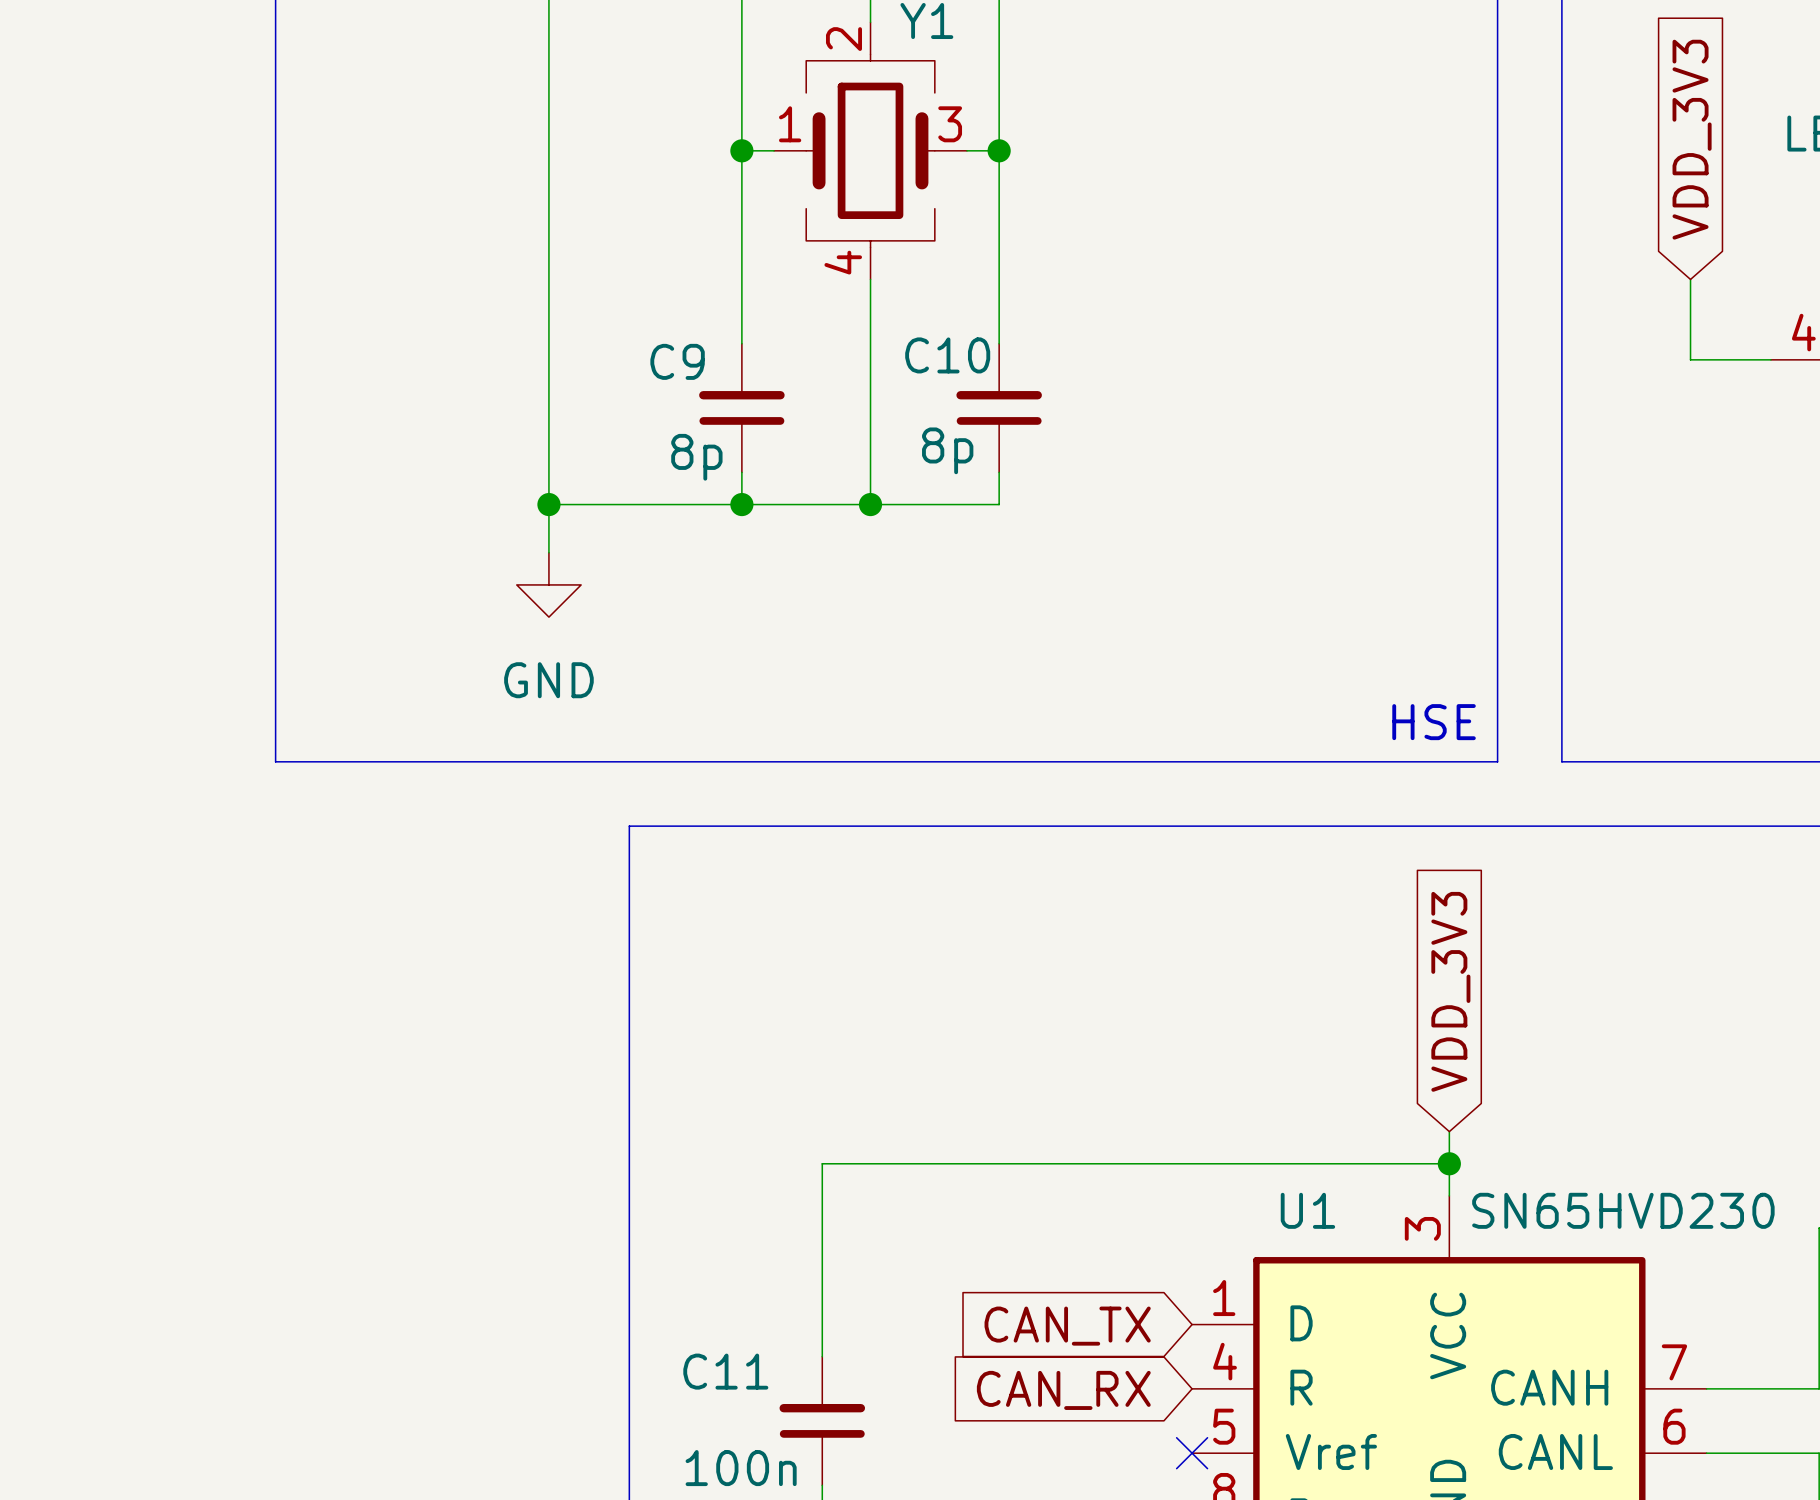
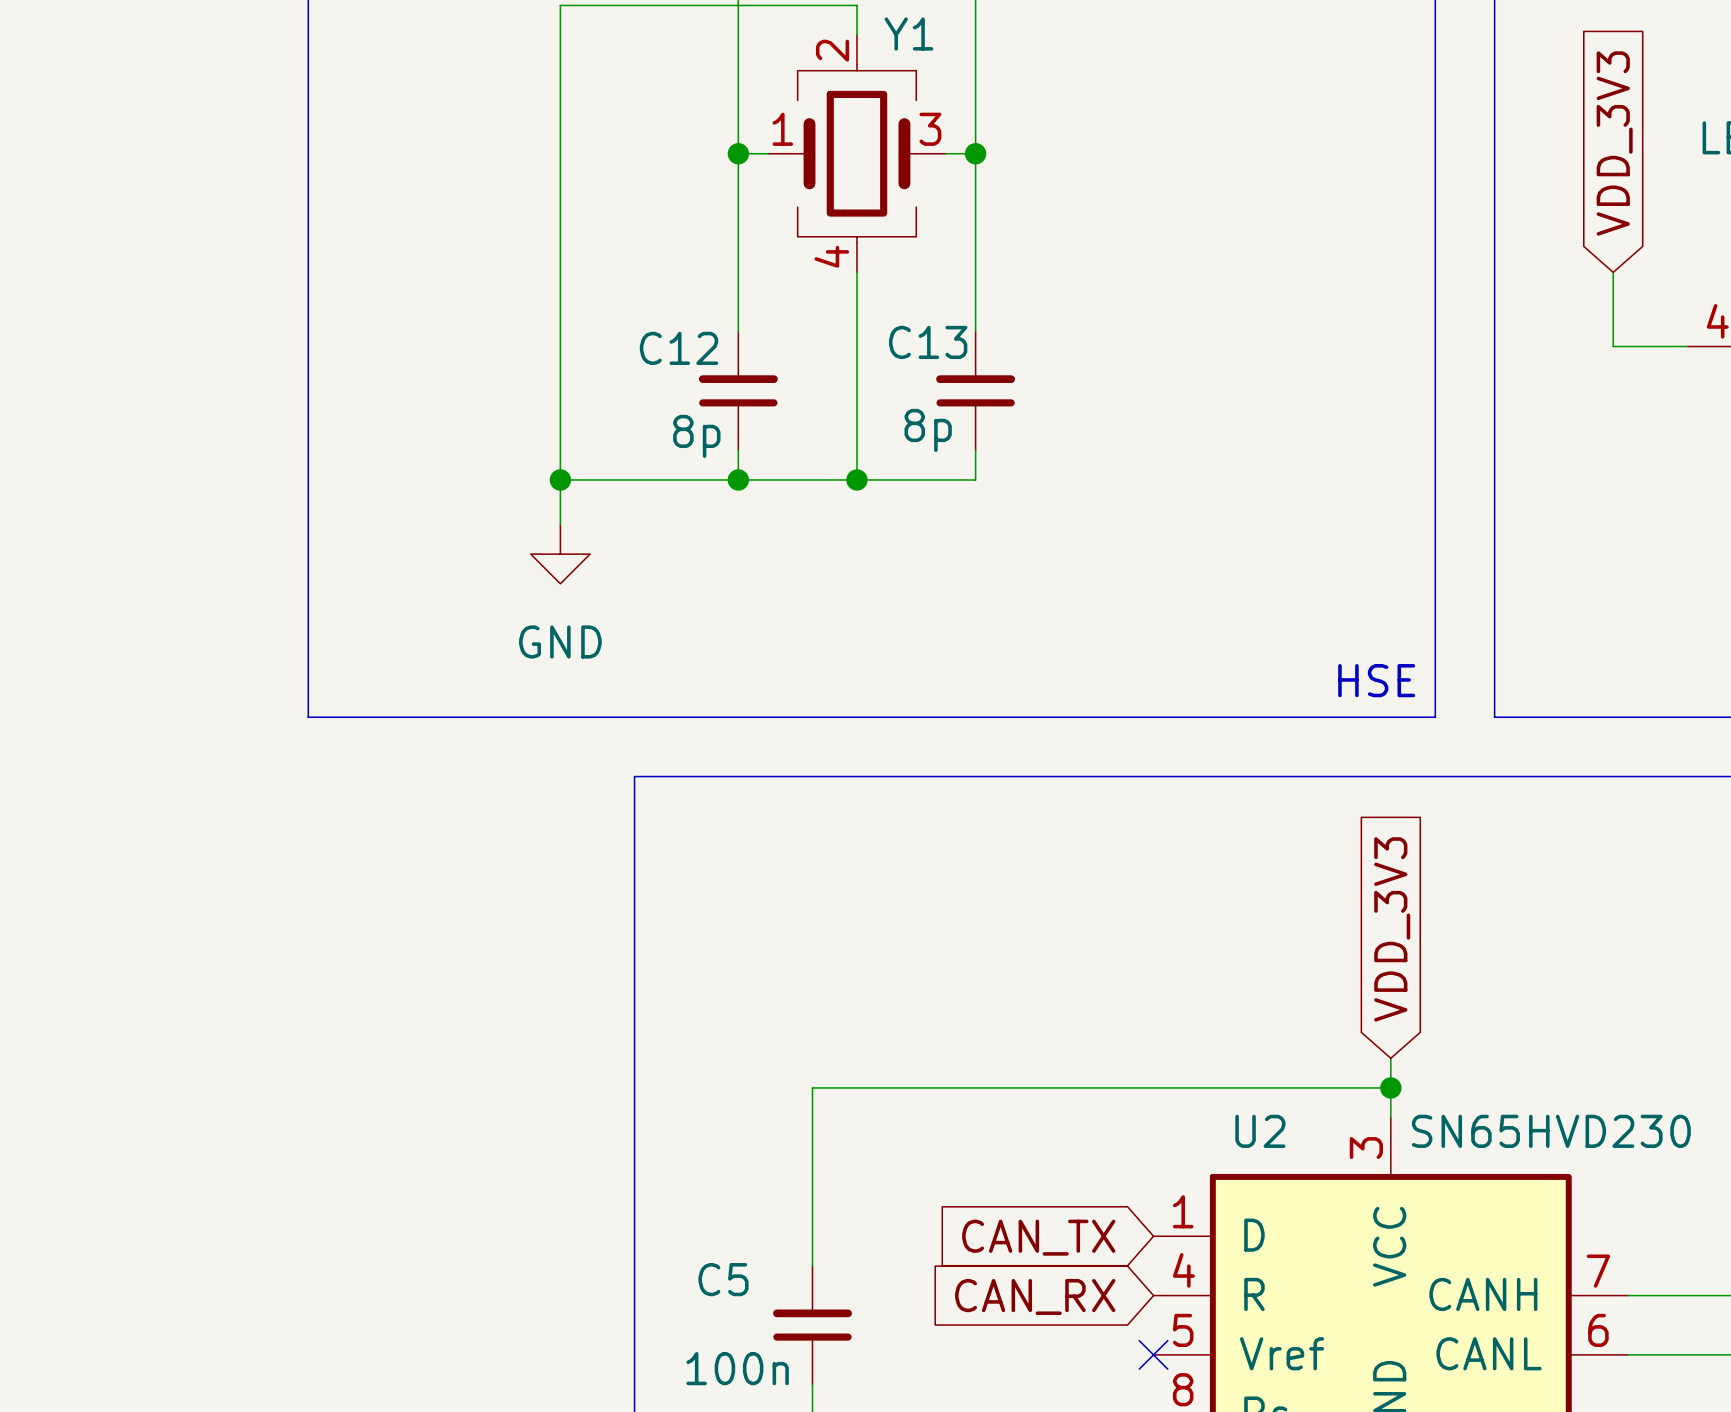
C10 name: C10 (947, 355) -> C13 (928, 342)
C9 name: C9 (677, 361) -> C12 (679, 348)
U1 name: U1 (1307, 1210) -> U2 (1260, 1131)
C11 name: C11 (725, 1371) -> C5 (723, 1279)

